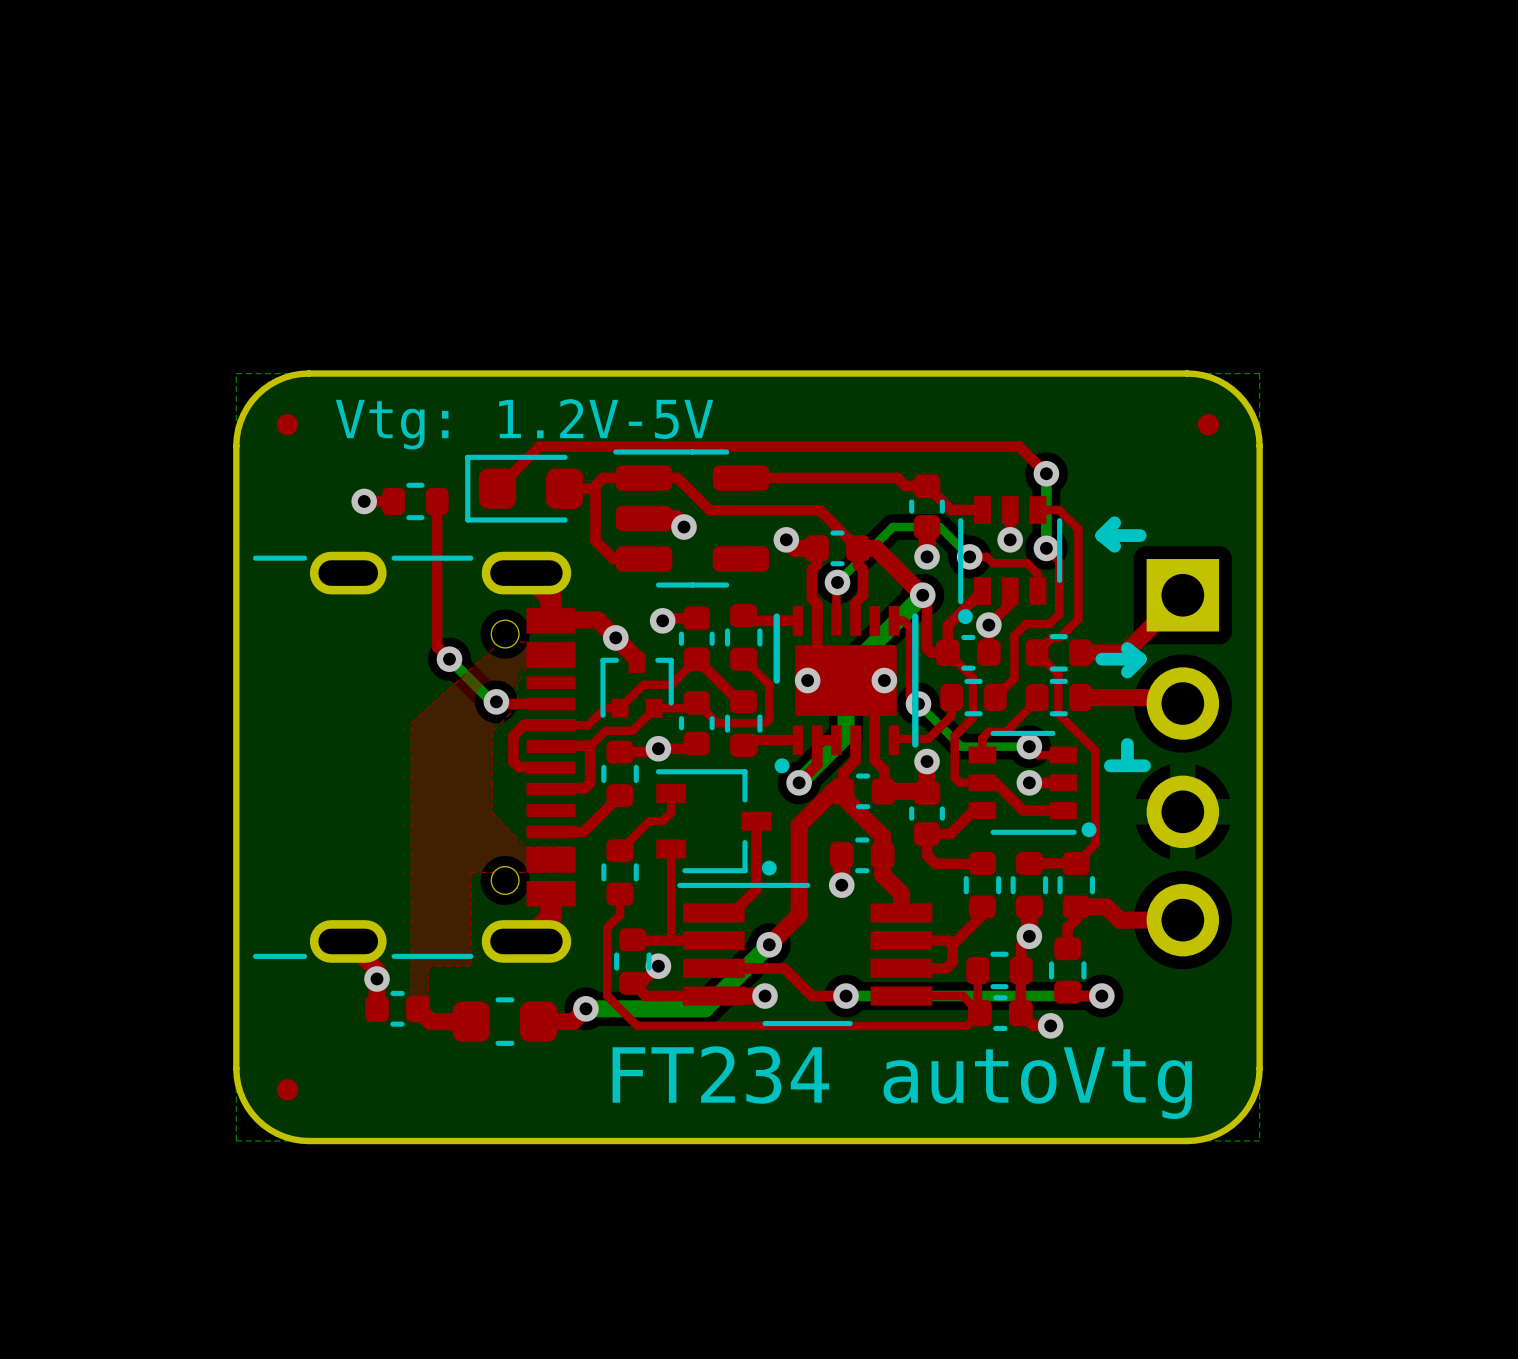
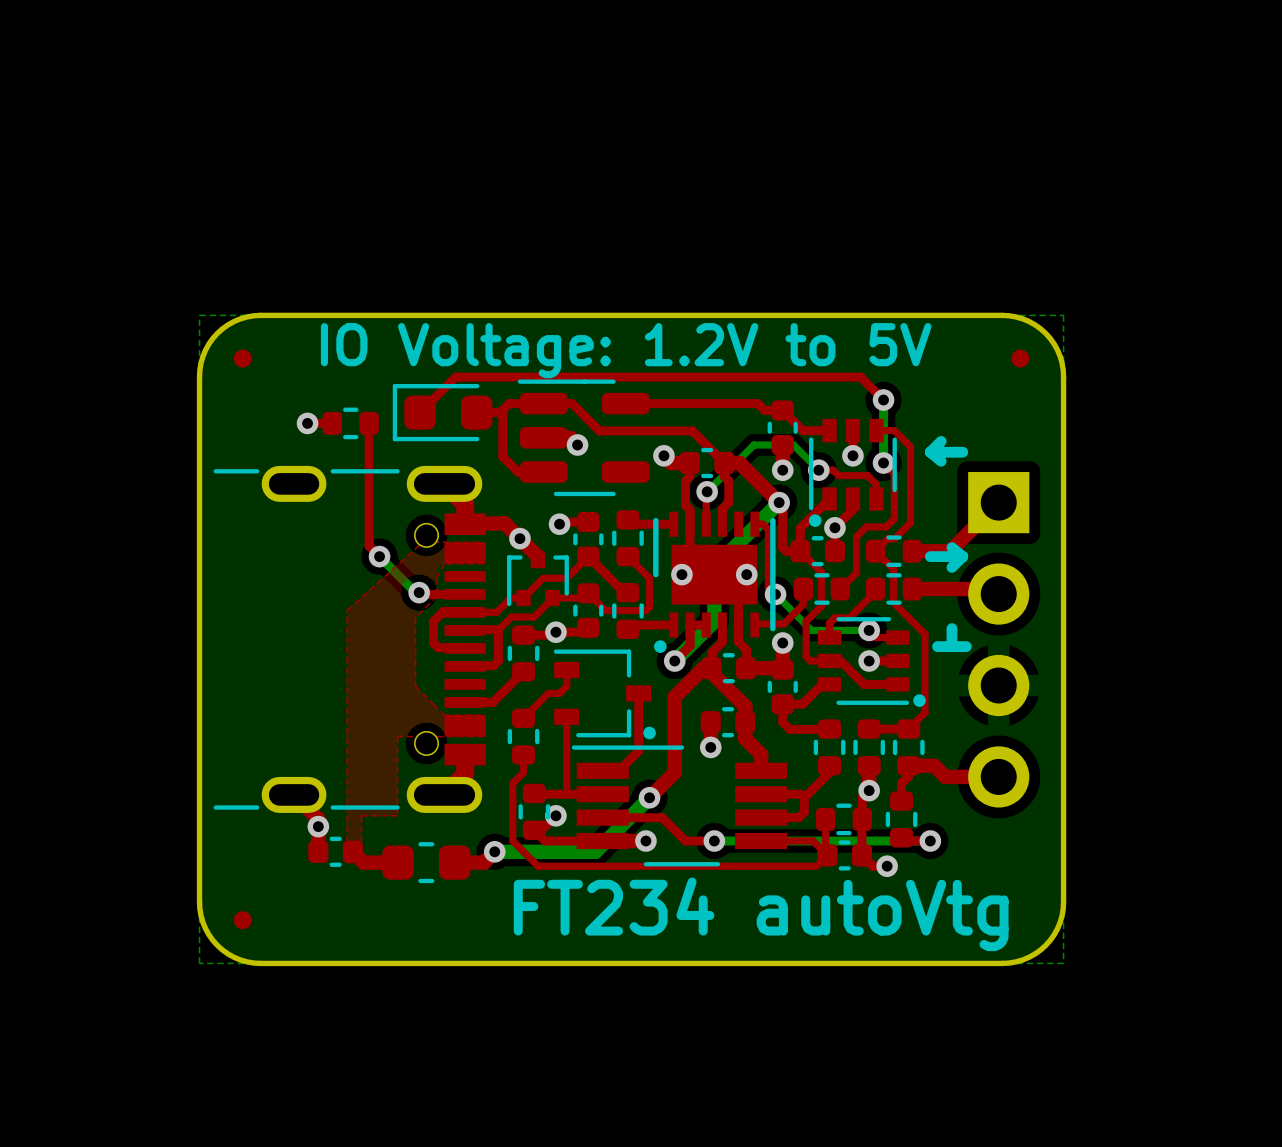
text: Vtg: 1.2V-5V (524, 424) -> IO Voltage: 1.2V to 5V (626, 350)

